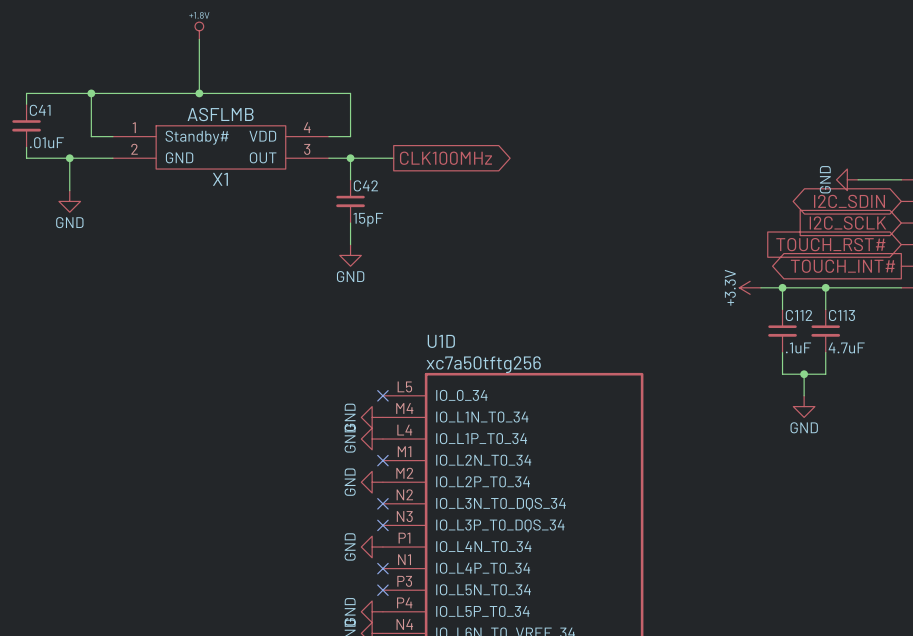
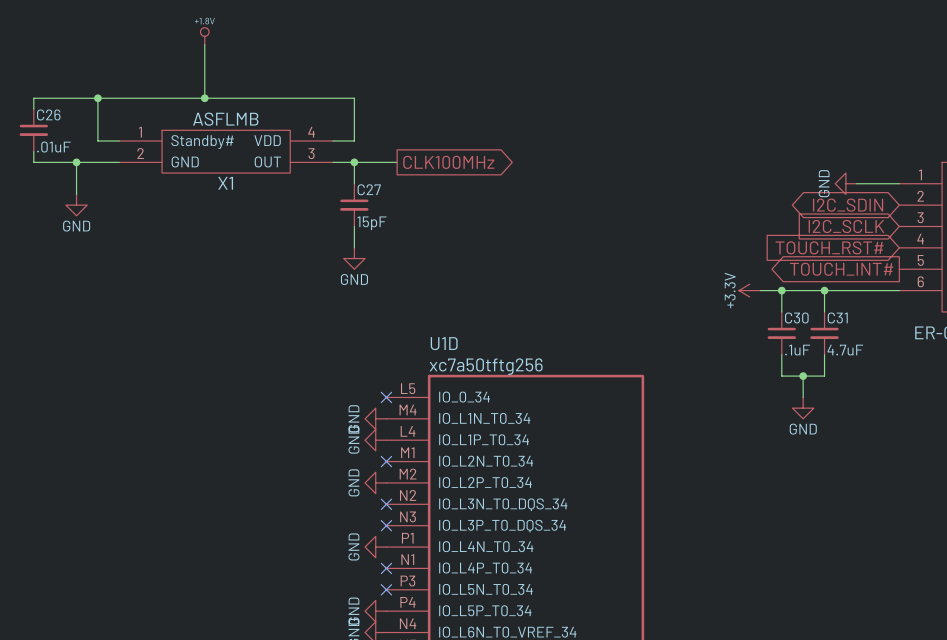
C41 name: C41 (40, 110) -> C26 (48, 114)
C42 name: C42 (365, 185) -> C27 (369, 189)
C112 name: C112 (799, 315) -> C30 (796, 317)
C113 name: C113 (841, 315) -> C31 (837, 317)

